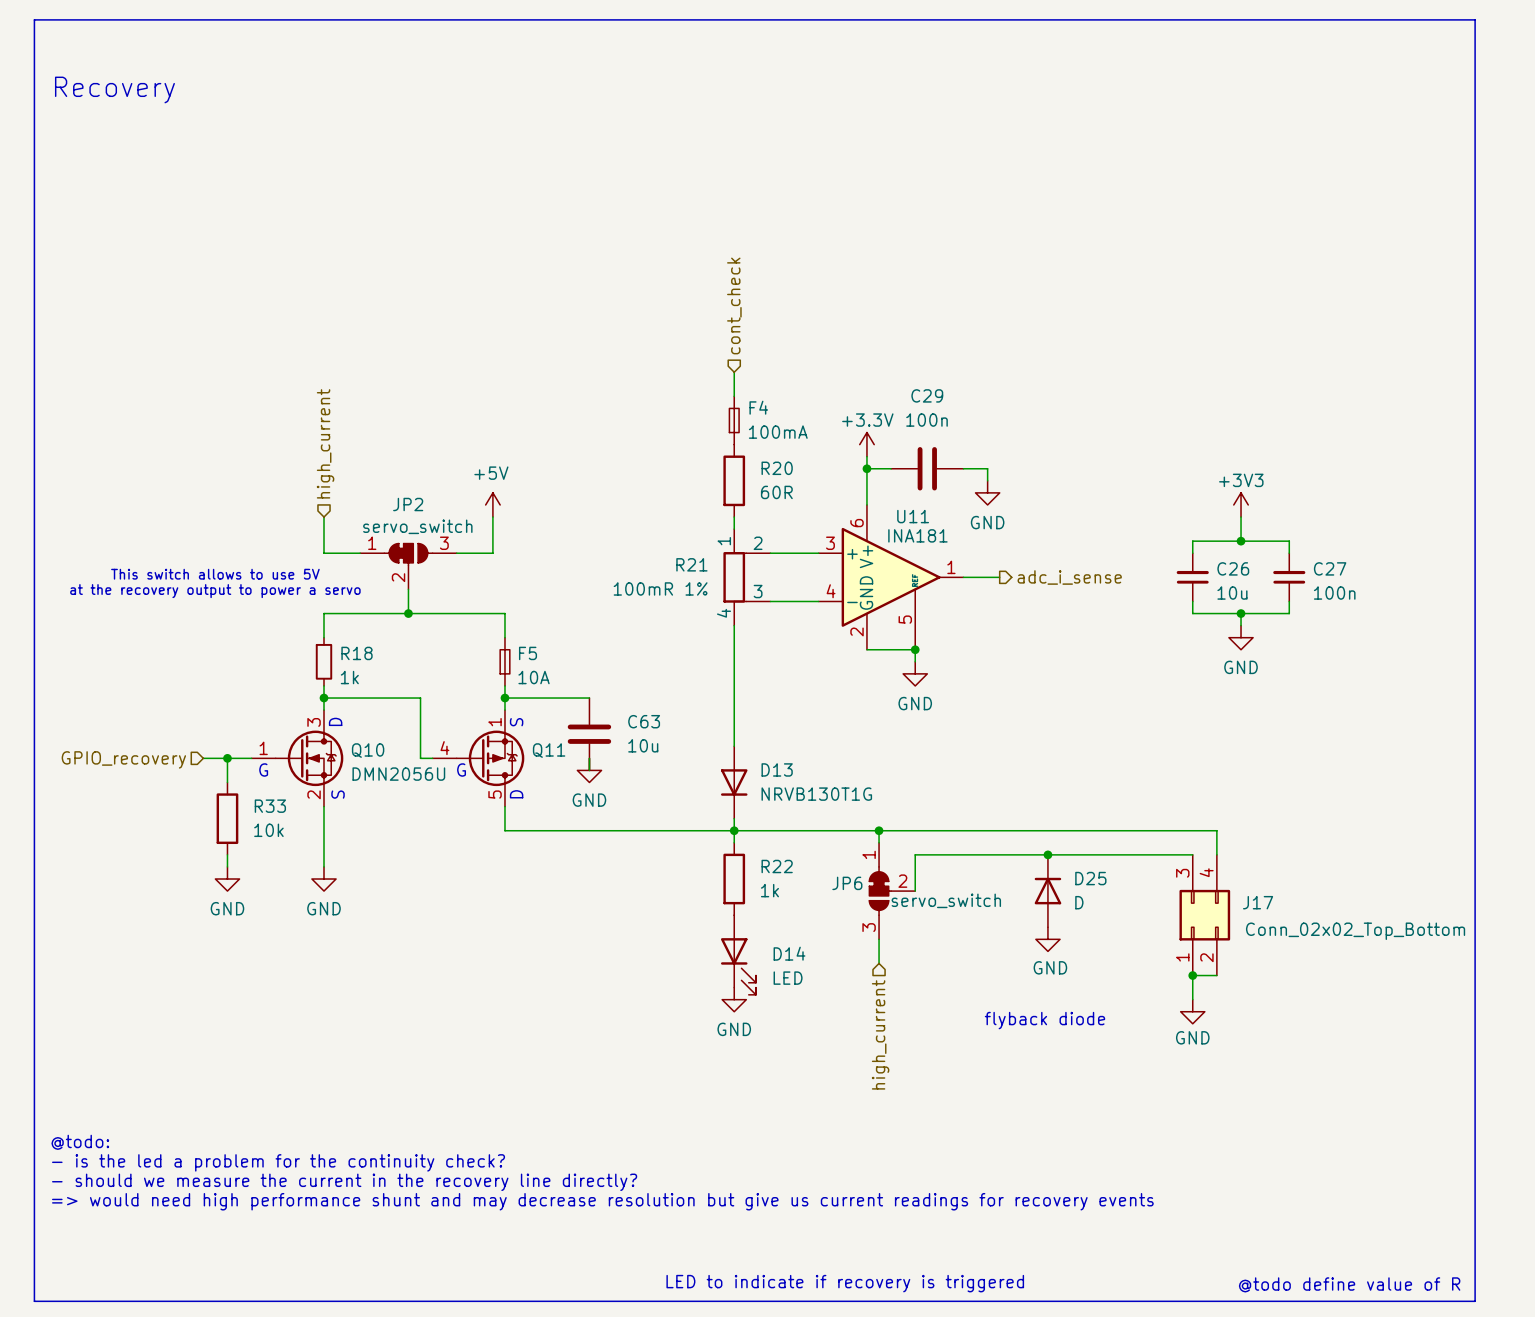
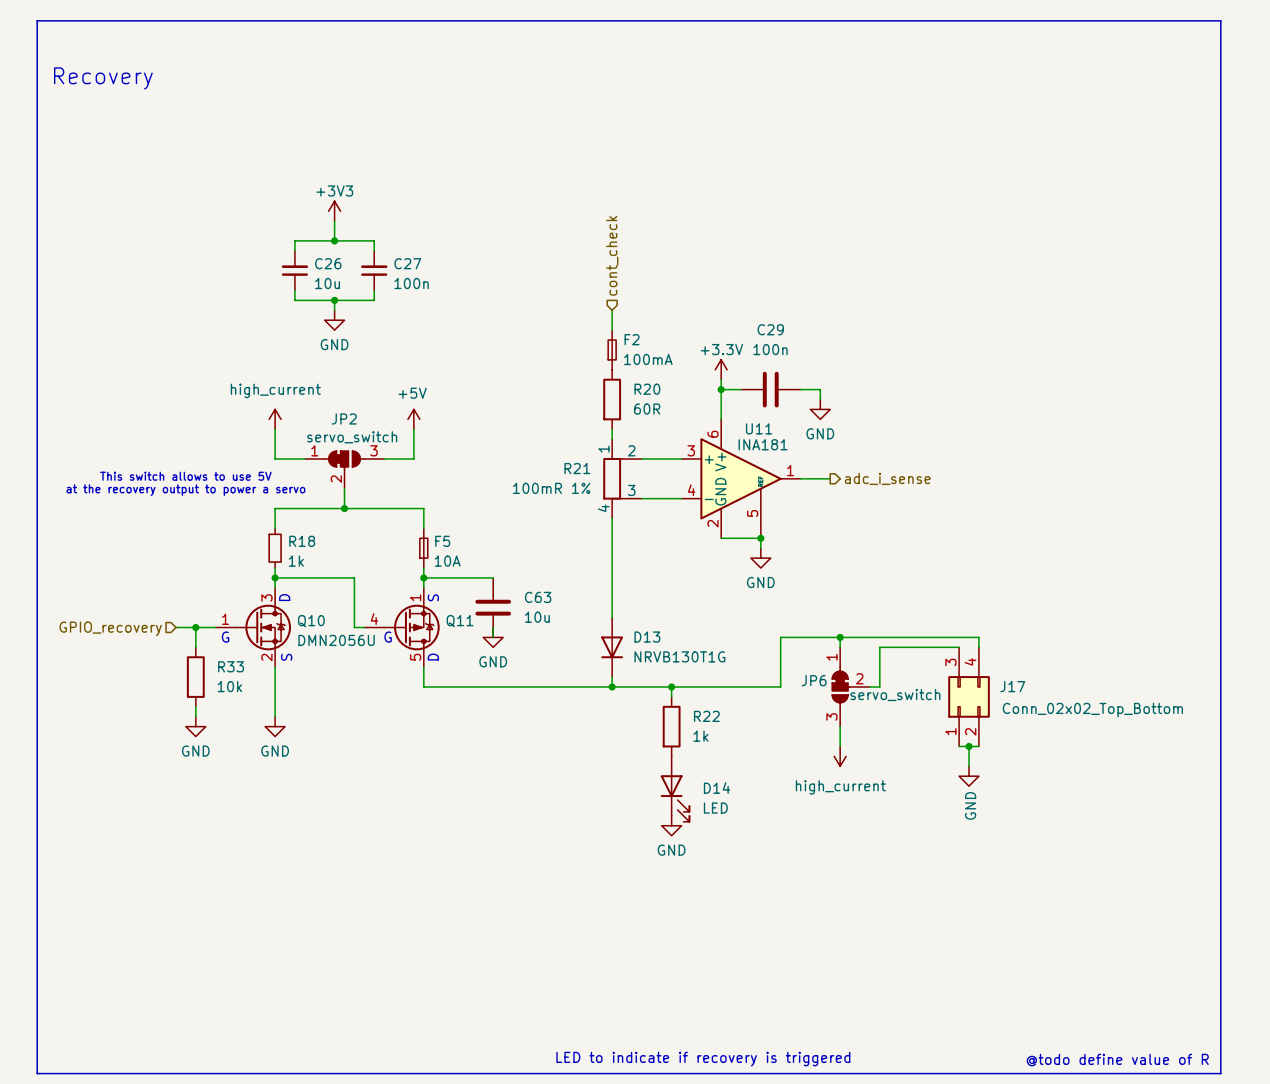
power symbol: none -> +3V3 (334, 211)
wire: none -> (334, 221) (334, 240)
junction: none -> (334, 240)
wire: none -> (294, 250) (294, 240) (374, 240) (374, 250)
wire: none -> (294, 290) (294, 300) (374, 300) (374, 290)
wire: none -> (334, 300) (334, 310)
junction: none -> (334, 300)
power symbol: none -> GND (334, 320)
F4 name: F4 (758, 407) -> F2 (632, 339)
hierarchical label: high_current (325, 443) -> none
power symbol: none -> high_current (275, 419)
power symbol: +3V3 (1241, 504) -> none
wire: (1241, 517) (1241, 541) -> none
junction: (1241, 541) -> none
wire: (1192, 553) (1192, 541) (1289, 541) (1289, 553) -> none
C26 position: (1192, 577) -> (294, 270)
C27 position: (1289, 577) -> (374, 270)
wire: (1192, 601) (1192, 613) (1289, 613) (1289, 601) -> none
wire: (1241, 613) (1241, 625) -> none
junction: (1241, 613) -> none
power symbol: GND (1241, 637) -> none
junction: none -> (840, 637)
wire: (734, 830) (734, 842) -> (671, 686) (671, 696)
junction: none -> (671, 686)
wire: (879, 830) (879, 842) -> (840, 637) (840, 647)
junction: (879, 830) -> none
wire: (939, 830) (1047, 830) -> (780, 686) (780, 637) (978, 637) (978, 647)
wire: (1060, 830) (1216, 830) (1216, 854) -> (879, 686) (879, 647) (959, 647)
junction: (1047, 854) -> none
wire: (1192, 854) (915, 854) (915, 891) -> none
R22 position: (734, 879) -> (671, 726)
JP6 position: (892, 891) -> (851, 686)
D25: D (1047, 891) -> none
wire: none -> (959, 746) (978, 746)
wire: none -> (969, 746) (969, 766)
junction: none -> (969, 746)
power symbol: none -> high_current (840, 756)
J17 position: (1204, 915) -> (969, 696)
wire: (879, 939) (879, 963) -> (840, 726) (840, 746)
power symbol: GND (1047, 939) -> none
power symbol: none -> GND (969, 776)
D14 position: (738, 955) -> (675, 789)
junction: (1192, 975) -> none
wire: (1216, 975) (1192, 975) (1192, 999) -> none
power symbol position: GND (734, 999) -> GND (671, 825)
power symbol: GND (1192, 1011) -> none
text: flyback diode (1044, 1020) -> none
hierarchical label: high_current (880, 1034) -> none
text: @todo: (80, 1142) -> none
text: - is the led a problem for the continuity check? (278, 1162) -> none
text: - should we measure the current in the recovery line directly? (344, 1182) -> none
text: => would need high performance shunt and may decrease resolution but give us current readings for recovery events (602, 1201) -> none

